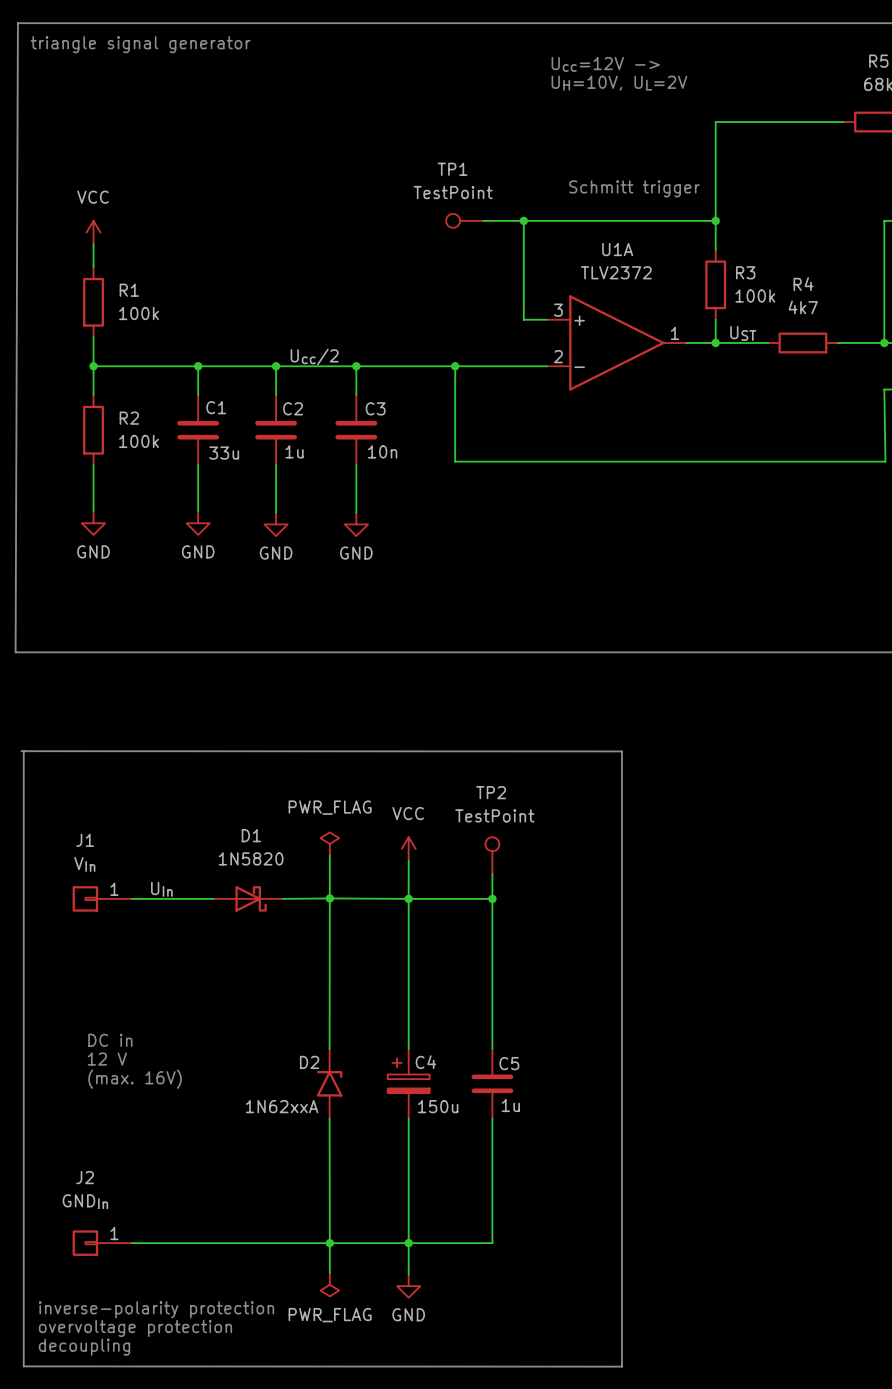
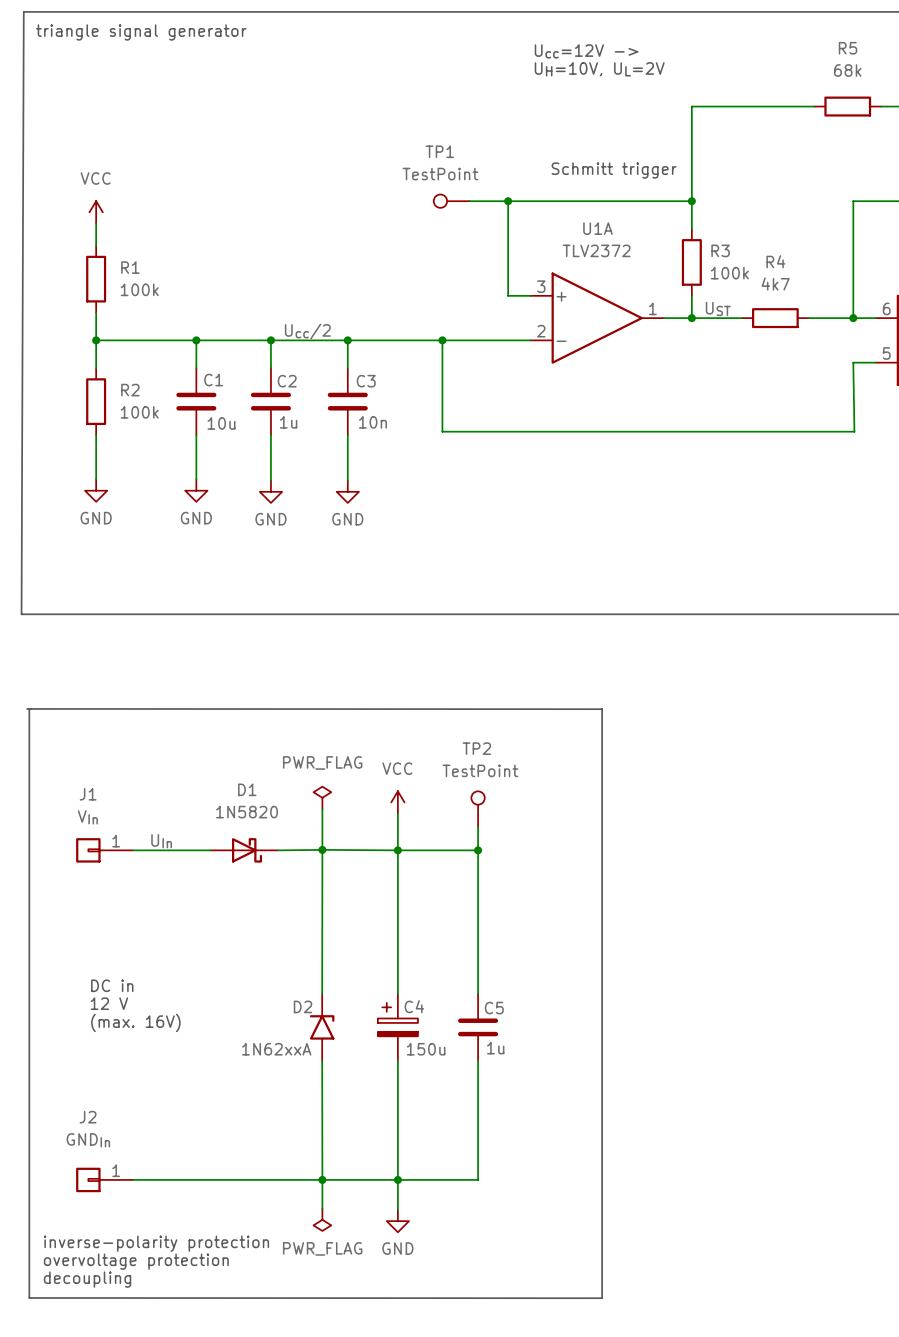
C1 value: 33u (224, 453) -> 10u (221, 423)

